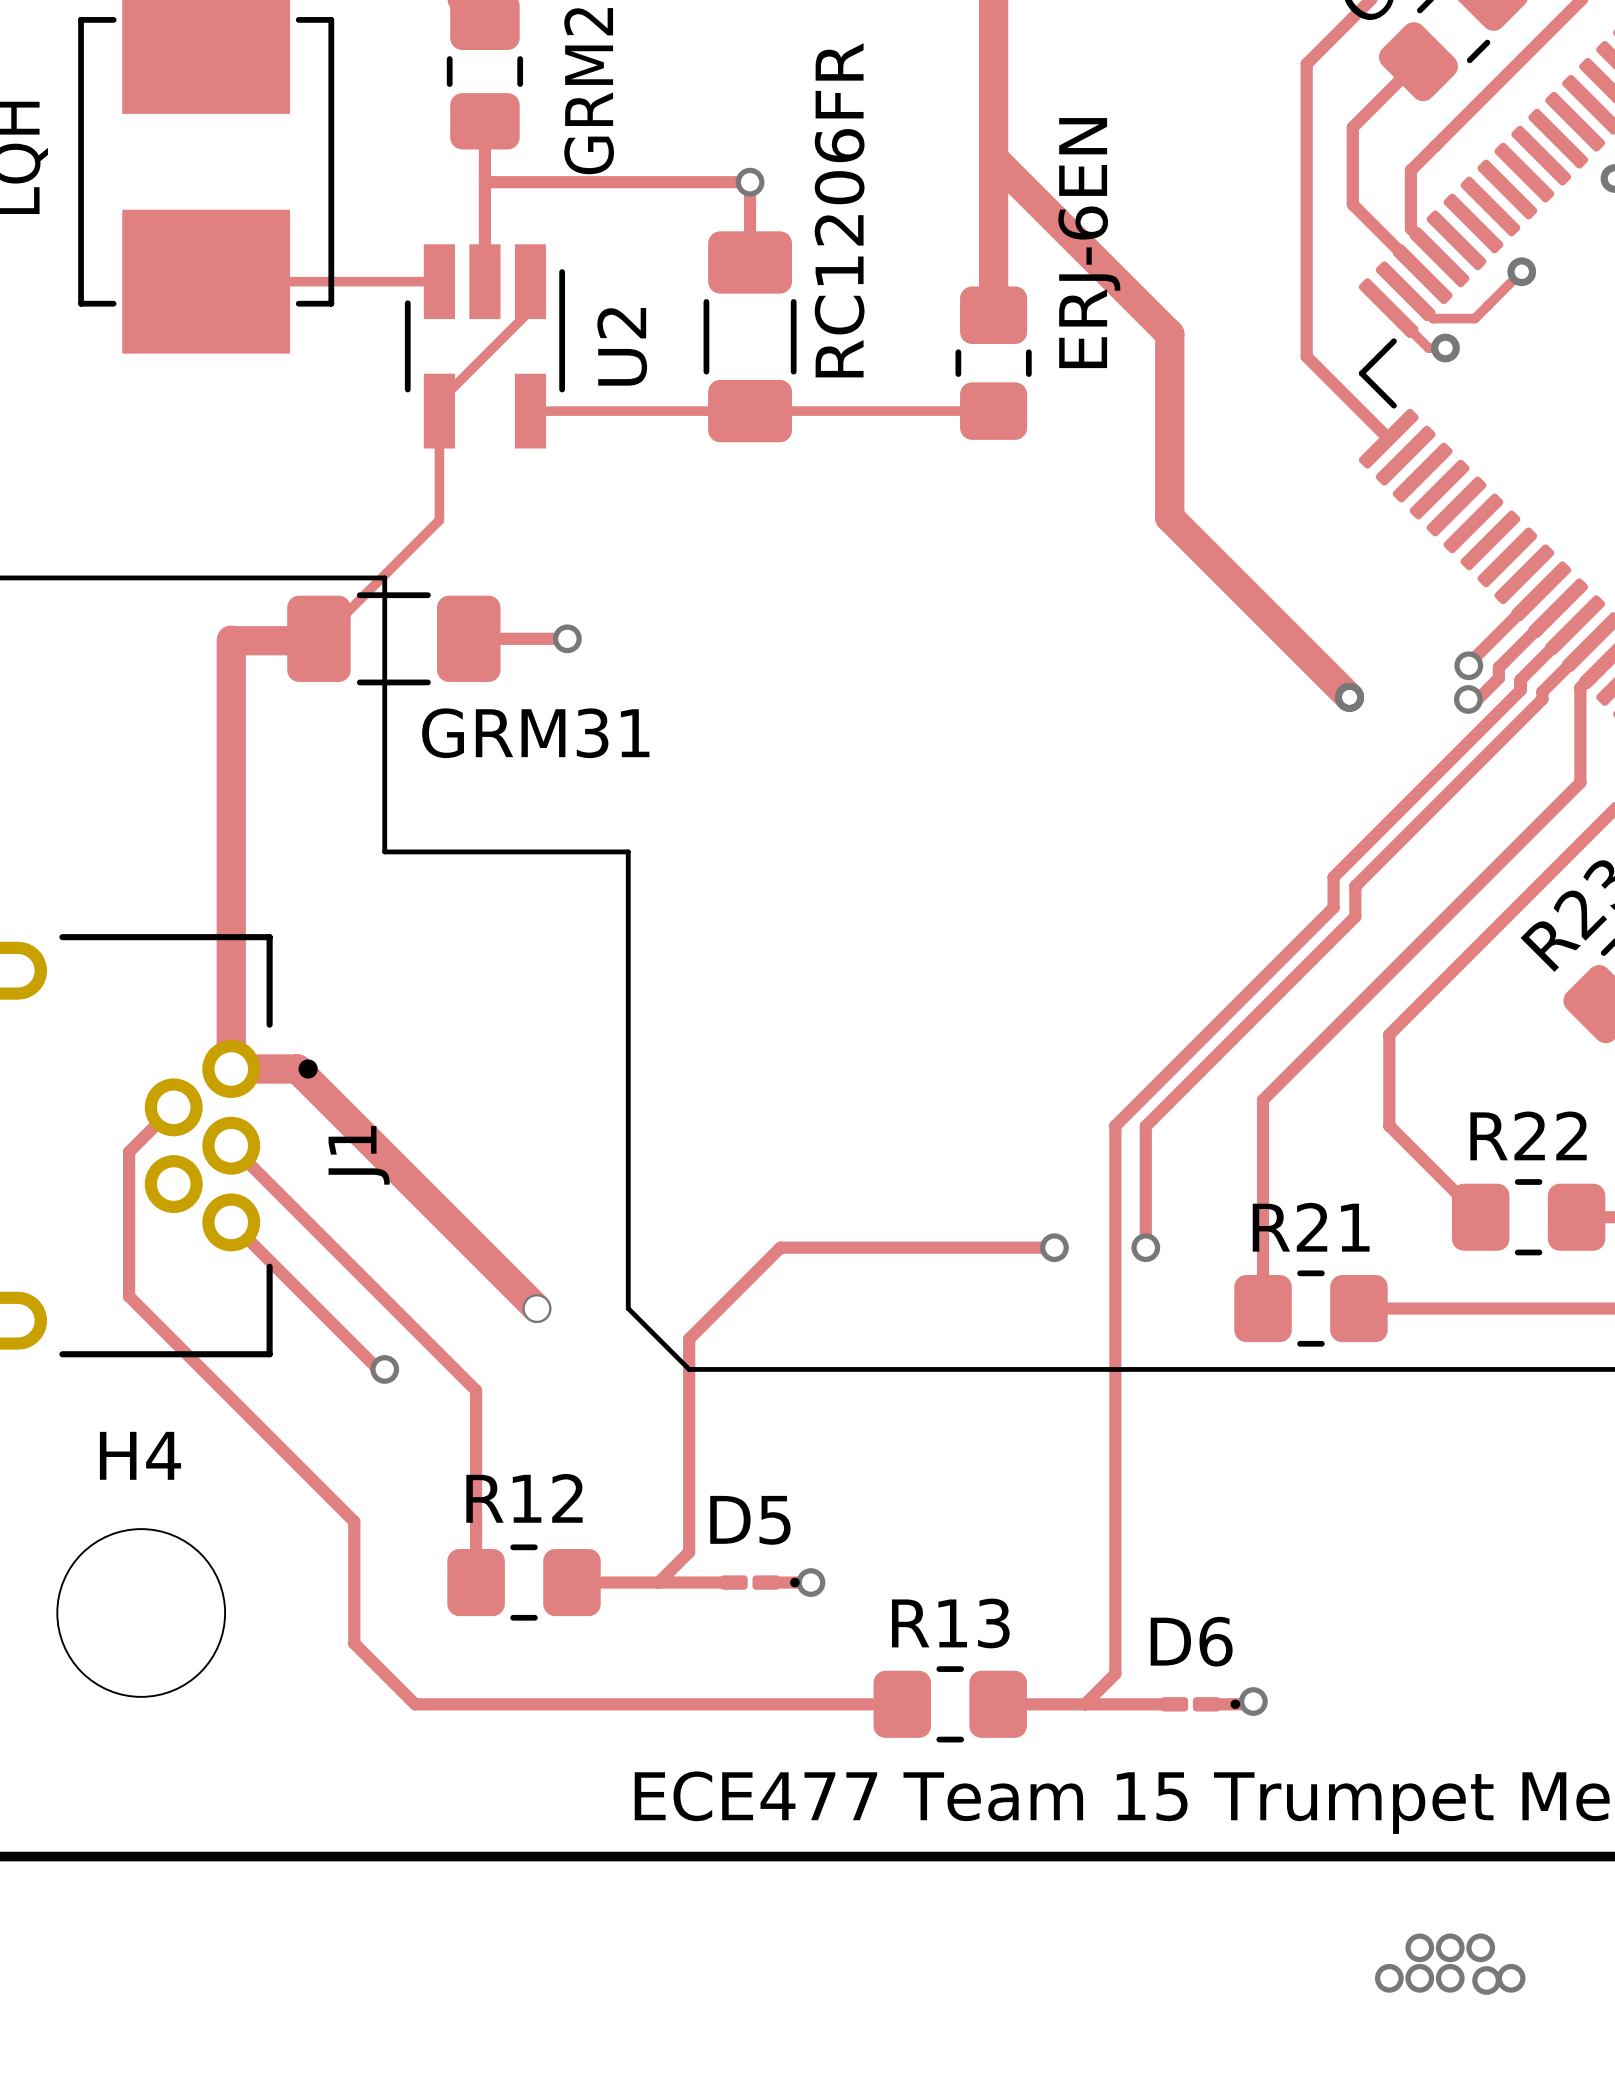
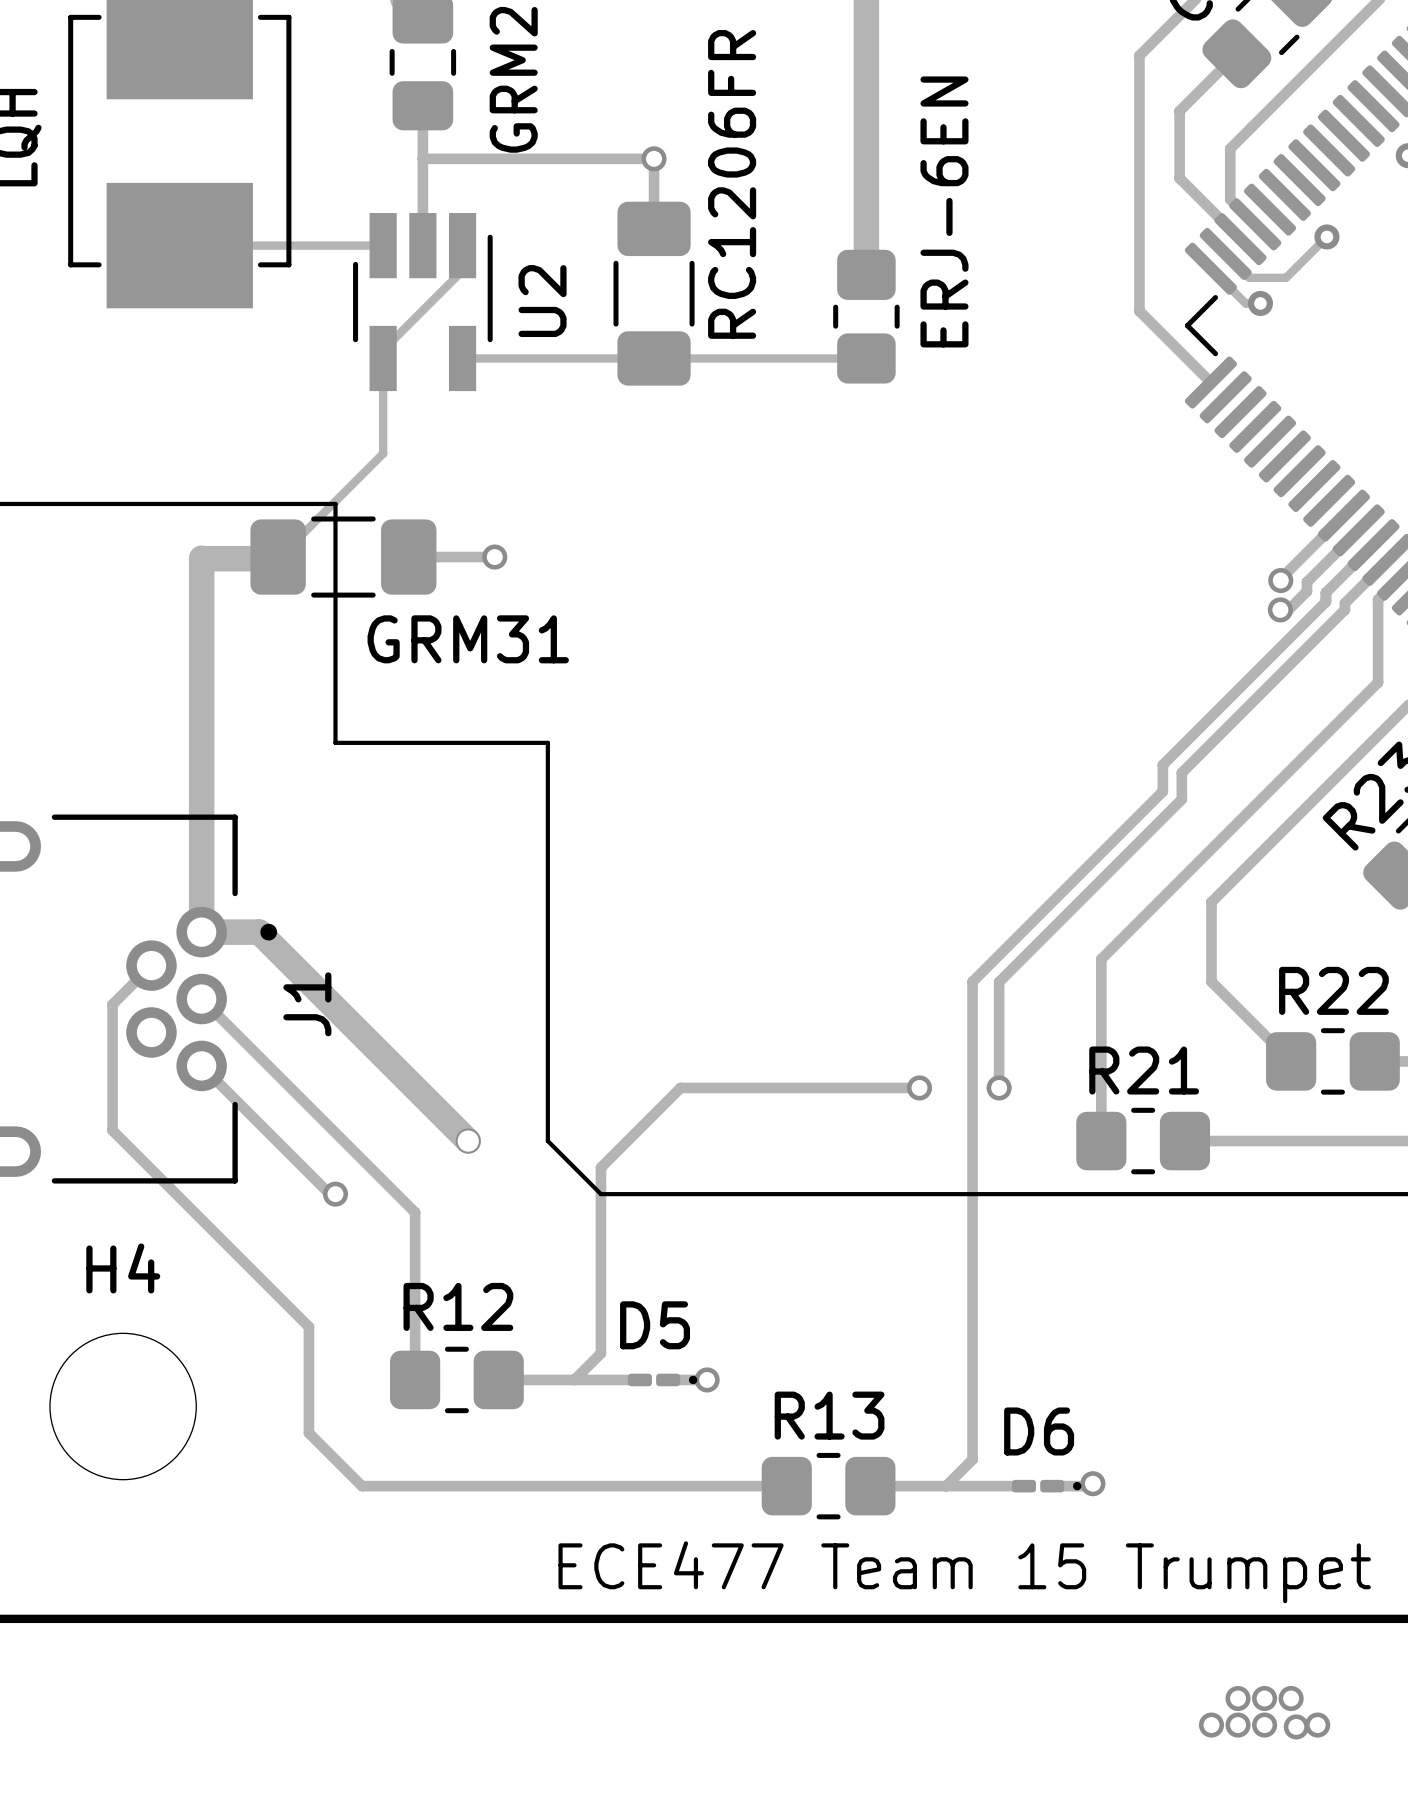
track: (993, 157) (1169, 334) (1169, 517) (1349, 697) -> none
via: (1349, 697) -> none

